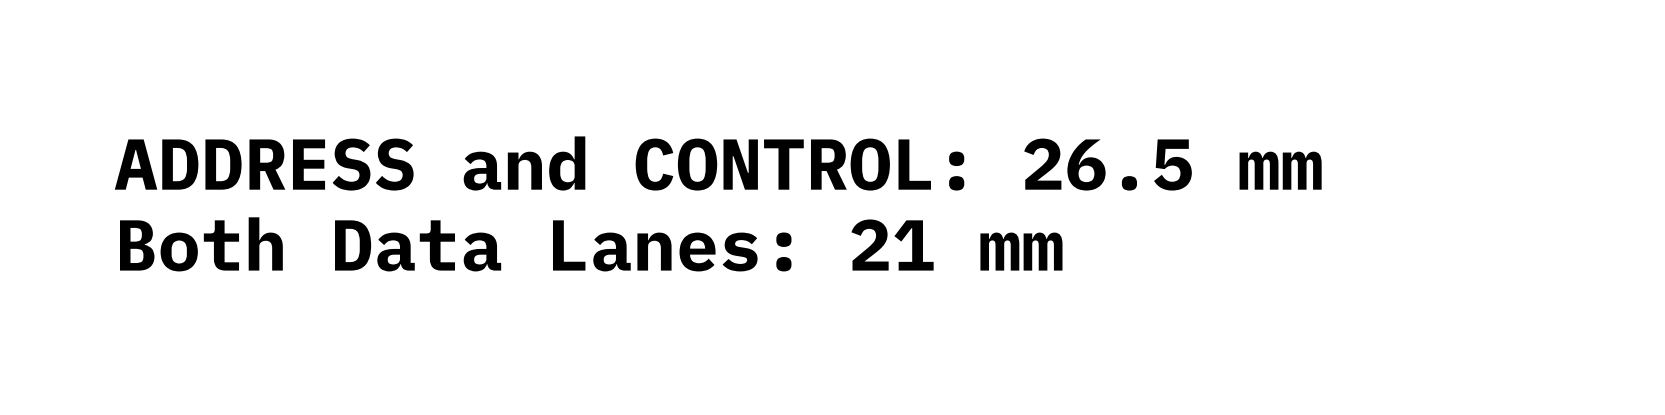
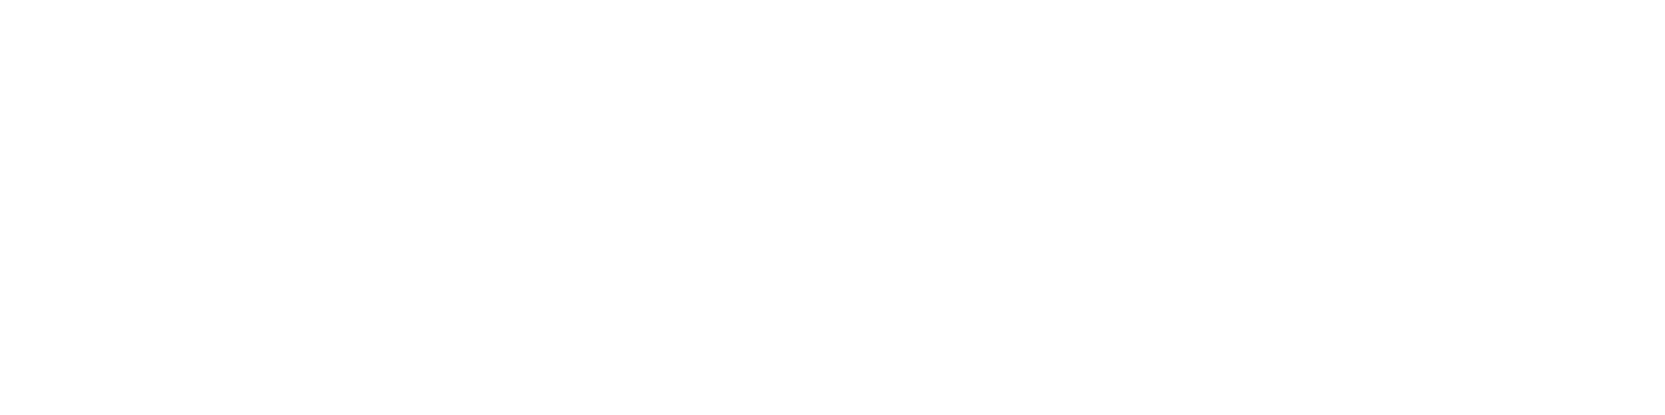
text: ADDRESS and CONTROL: 26.5 mm (718, 163) -> none
text: Both Data Lanes: 21 mm (591, 244) -> none

